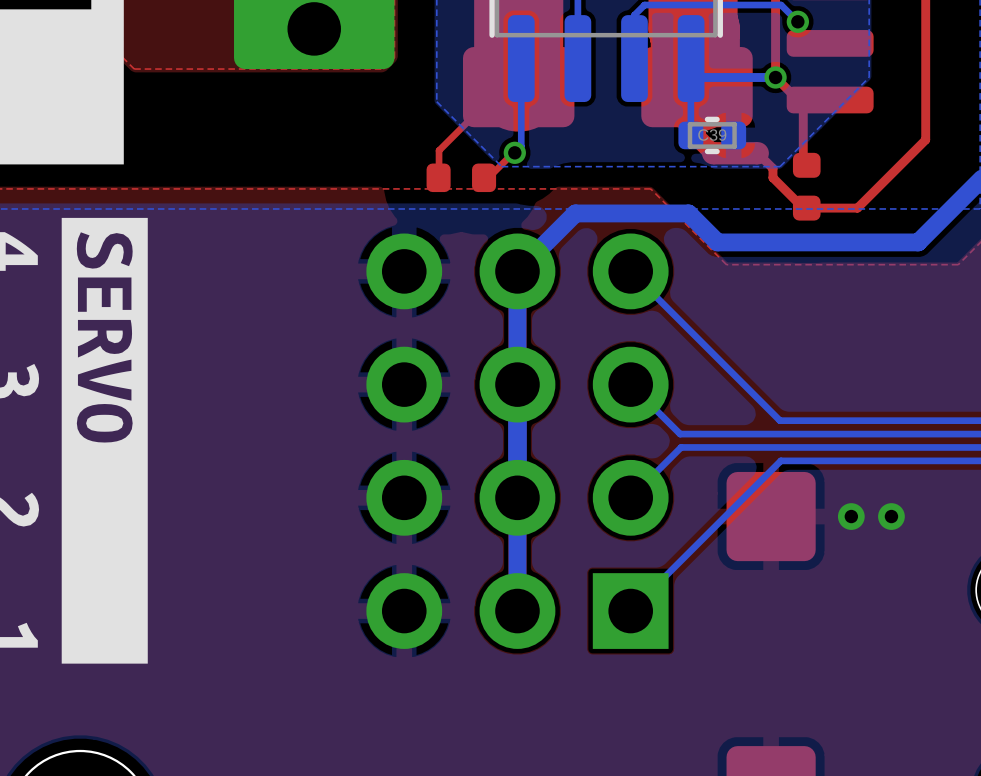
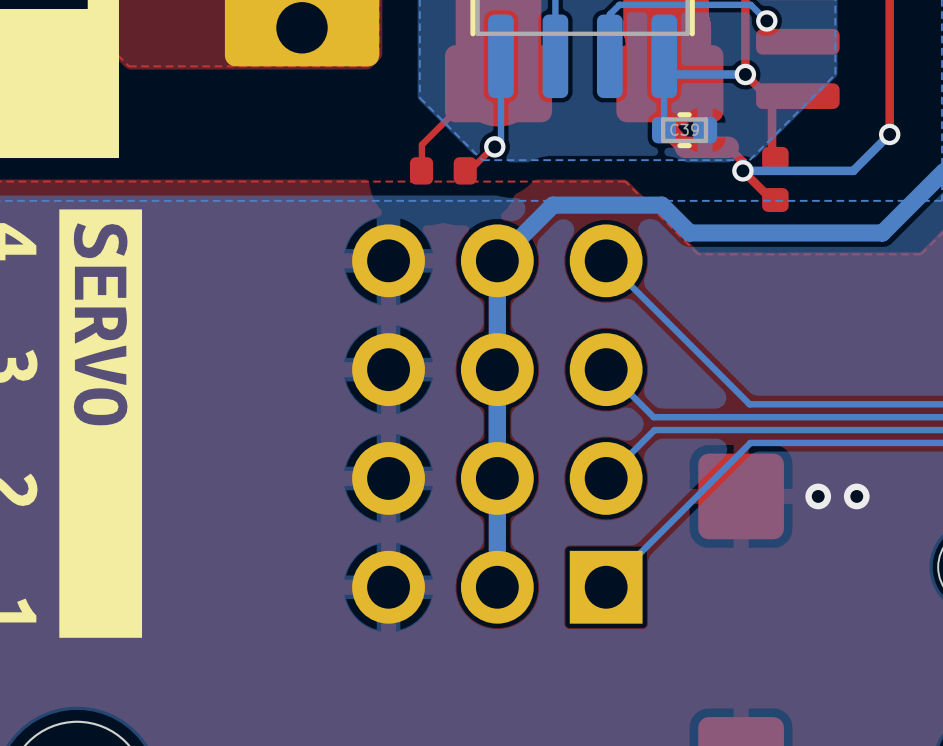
top track: (925, 139) (857, 208) (806, 208) -> none
bottom track: none -> (889, 134) (853, 170) (742, 170)
via: none -> (889, 134)
via: none -> (742, 170)

